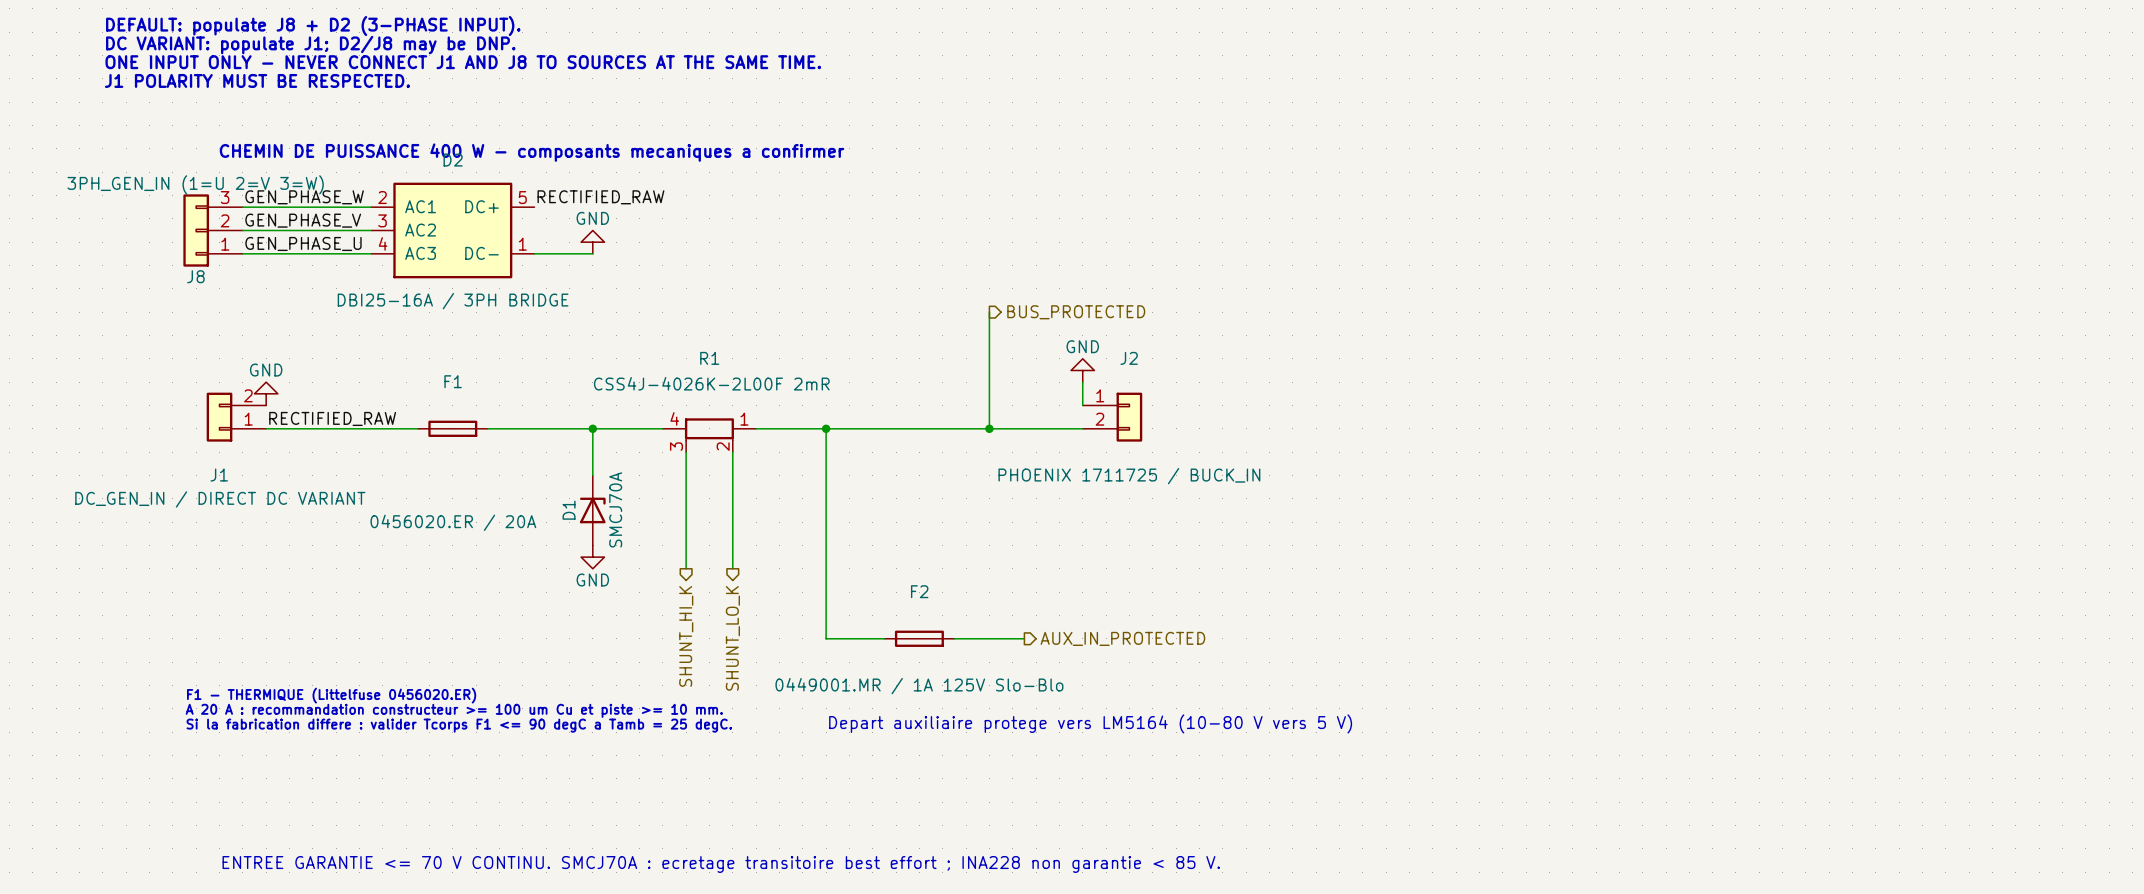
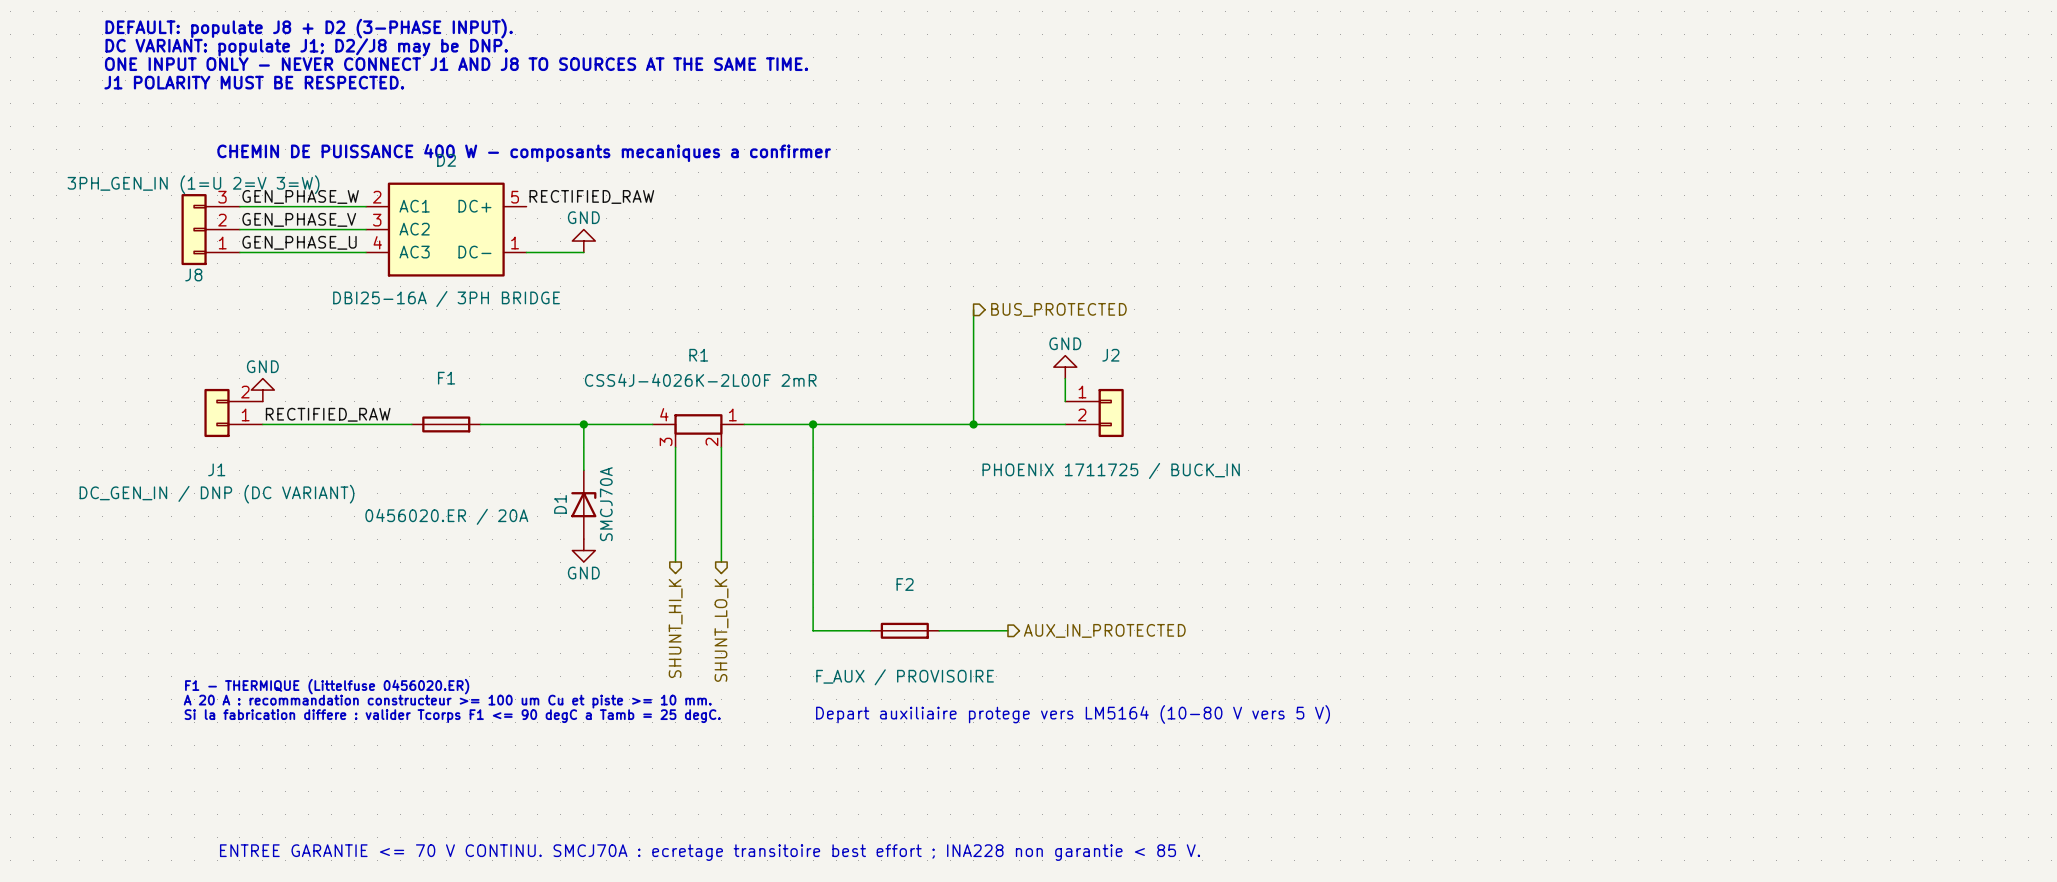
J1 value: DC_GEN_IN / DIRECT DC VARIANT (220, 499) -> DC_GEN_IN / DNP (DC VARIANT) (217, 494)
F2 value: 0449001.MR / 1A 125V Slo-Blo (919, 686) -> F_AUX / PROVISOIRE (905, 677)

